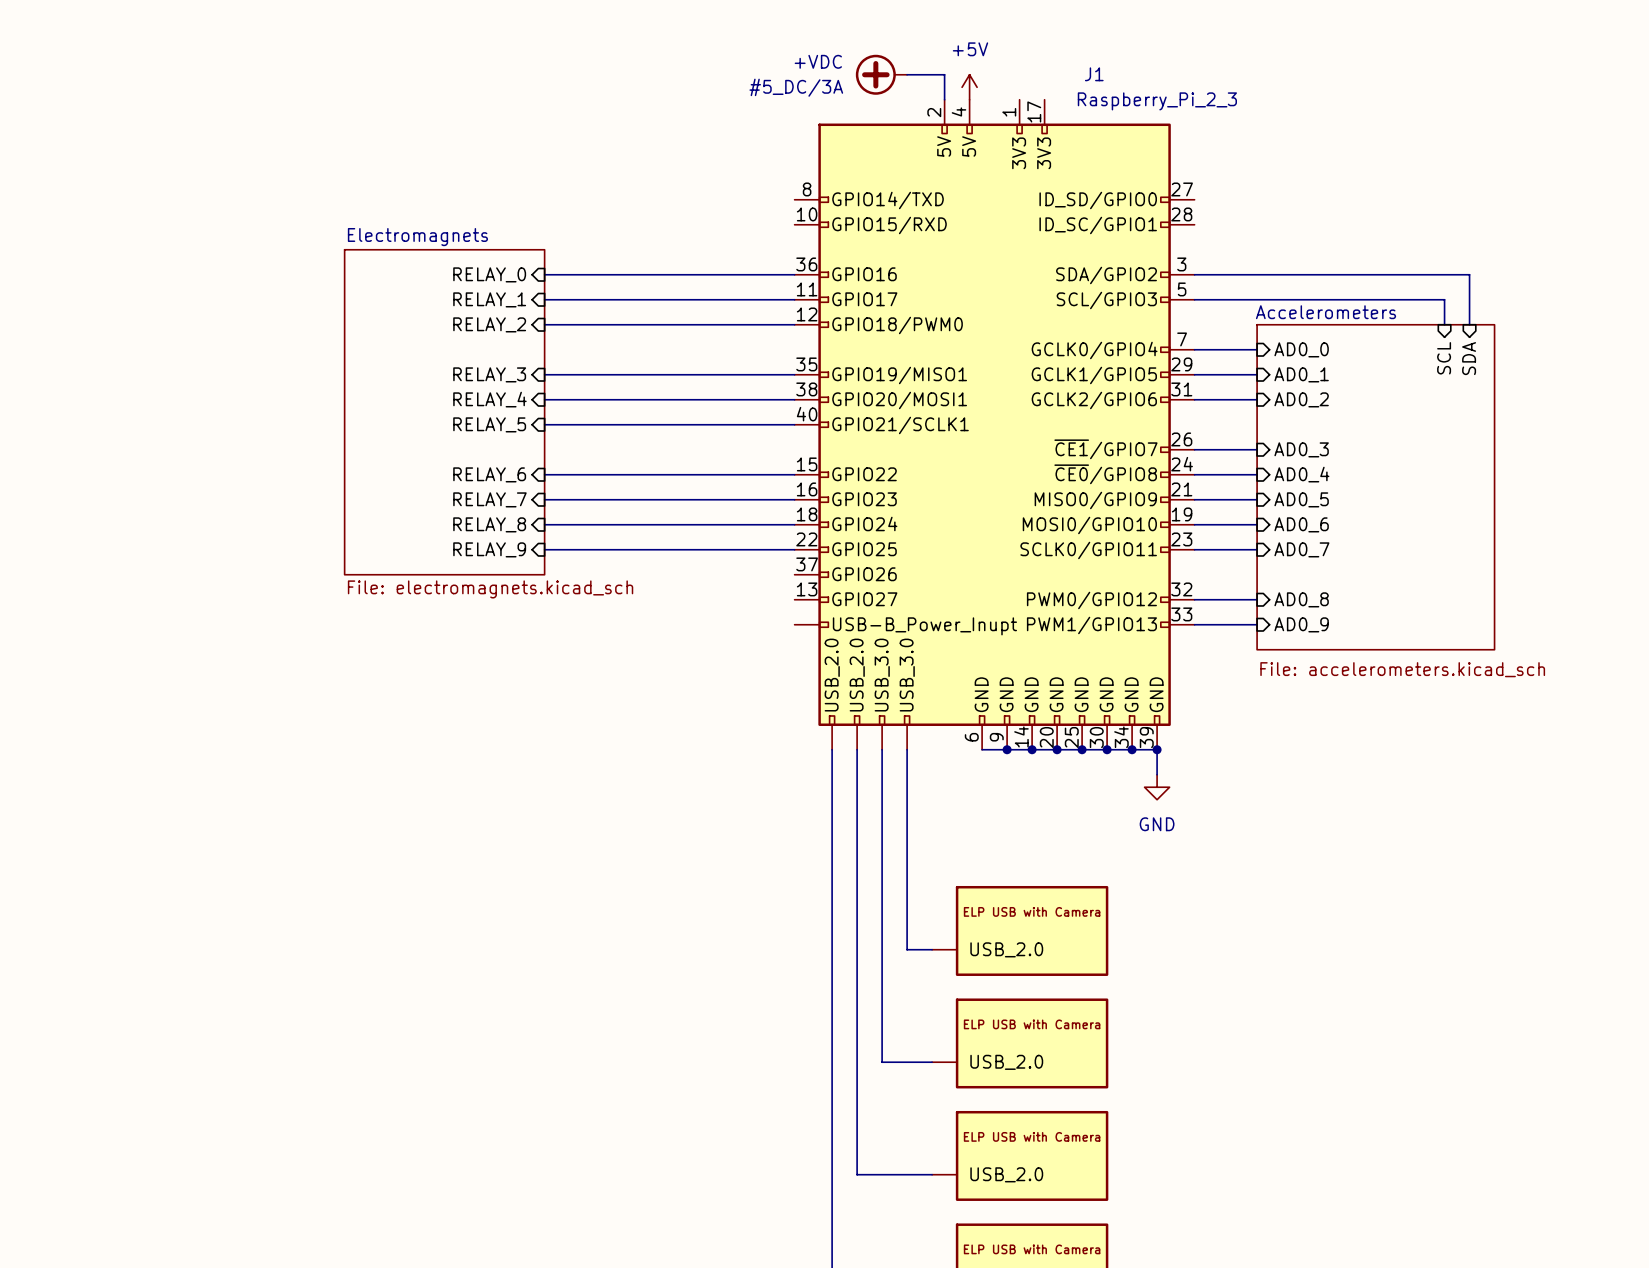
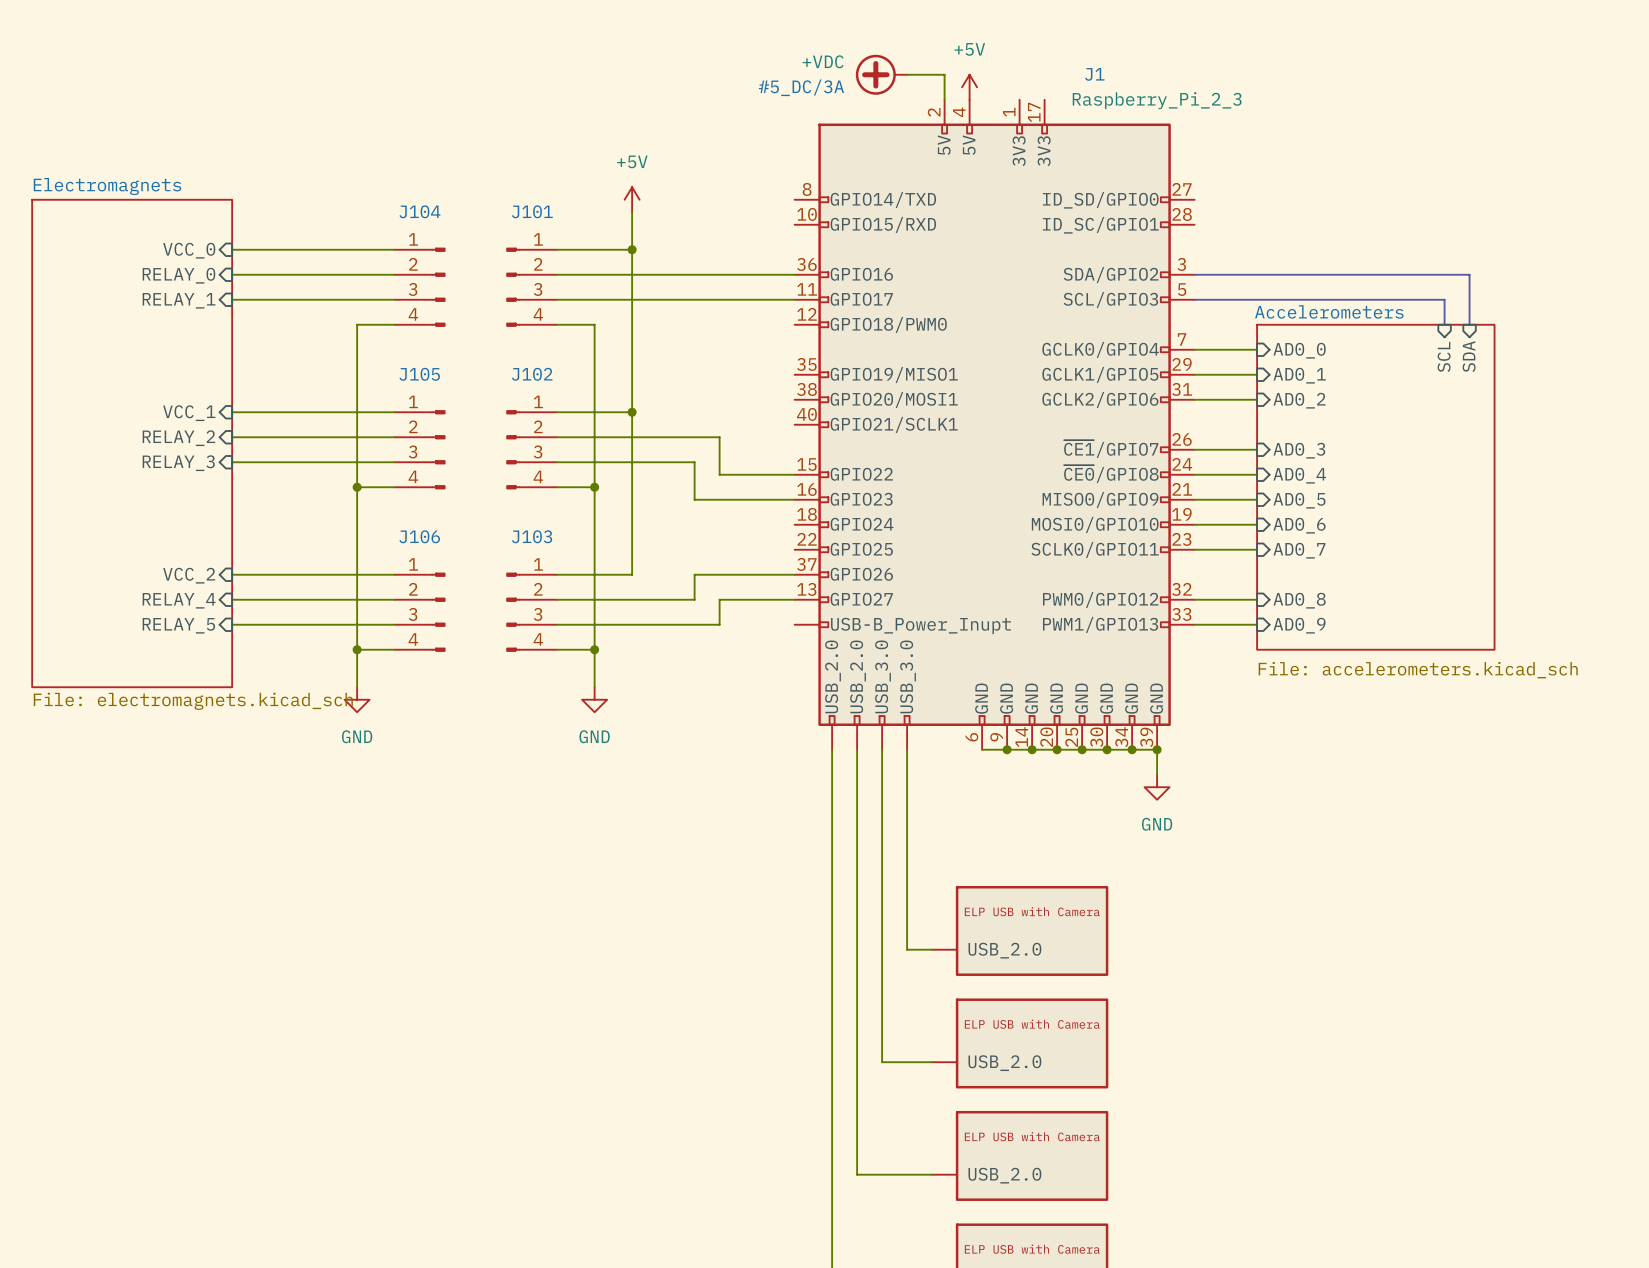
power symbol: none -> +5V (632, 199)
wire: none -> (632, 212) (632, 574) (557, 574)
sheet pin: none -> VCC_0 (189, 250)
wire: none -> (232, 249) (394, 249)
wire: none -> (557, 249) (632, 249)
junction: none -> (632, 249)
sheet pin: none -> RELAY_0 (178, 275)
wire: none -> (232, 274) (394, 274)
sheet pin: RELAY_0 (489, 274) -> none
J104: none -> (420, 287)
J101: none -> (531, 287)
sheet pin: none -> RELAY_1 (179, 300)
wire: none -> (232, 299) (394, 299)
sheet pin: RELAY_1 (489, 299) -> none
wire: none -> (394, 324) (357, 324) (357, 687)
sheet pin: RELAY_2 (489, 324) -> none
wire: (594, 324) (794, 324) -> (594, 324) (594, 687)
sheet pin: RELAY_3 (489, 374) -> none
wire: (544, 374) (794, 374) -> none
sheet pin: RELAY_4 (489, 399) -> none
wire: (544, 399) (794, 399) -> none
sheet pin: none -> VCC_1 (189, 413)
wire: none -> (232, 412) (394, 412)
sheet Electromagnets: File: electromagnets.kicad_sch (444, 412) -> none
wire: none -> (557, 412) (632, 412)
junction: none -> (632, 412)
sheet pin: RELAY_5 (489, 424) -> none
wire: (544, 424) (794, 424) -> none
sheet pin: none -> RELAY_2 (178, 438)
wire: none -> (232, 437) (394, 437)
sheet Electromagnets: none -> File: electromagnets.kicad_sch (132, 443)
J105: none -> (420, 449)
J102: none -> (531, 449)
sheet pin: none -> RELAY_3 (178, 463)
wire: none -> (232, 462) (394, 462)
sheet pin: RELAY_6 (489, 474) -> none
wire: (544, 474) (719, 474) -> (557, 437) (719, 437) (719, 474)
wire: none -> (357, 487) (394, 487)
junction: none -> (357, 487)
wire: none -> (557, 487) (594, 487)
junction: none -> (594, 487)
sheet pin: RELAY_7 (489, 499) -> none
wire: (544, 499) (694, 499) -> (557, 462) (694, 462) (694, 499)
sheet pin: RELAY_8 (489, 524) -> none
wire: (544, 524) (794, 524) -> none
sheet pin: RELAY_9 (489, 549) -> none
wire: (544, 549) (794, 549) -> none
sheet pin: none -> VCC_2 (189, 575)
wire: none -> (232, 574) (394, 574)
wire: none -> (794, 574) (694, 574) (694, 599) (557, 599)
sheet pin: none -> RELAY_4 (179, 600)
wire: none -> (232, 599) (394, 599)
wire: none -> (794, 599) (719, 599) (719, 624) (557, 624)
J106: none -> (420, 612)
J103: none -> (531, 612)
sheet pin: none -> RELAY_5 (178, 625)
wire: none -> (232, 624) (394, 624)
wire: none -> (357, 649) (394, 649)
junction: none -> (357, 649)
wire: none -> (557, 649) (594, 649)
junction: none -> (594, 649)
power symbol: none -> GND (357, 699)
power symbol: none -> GND (594, 699)

